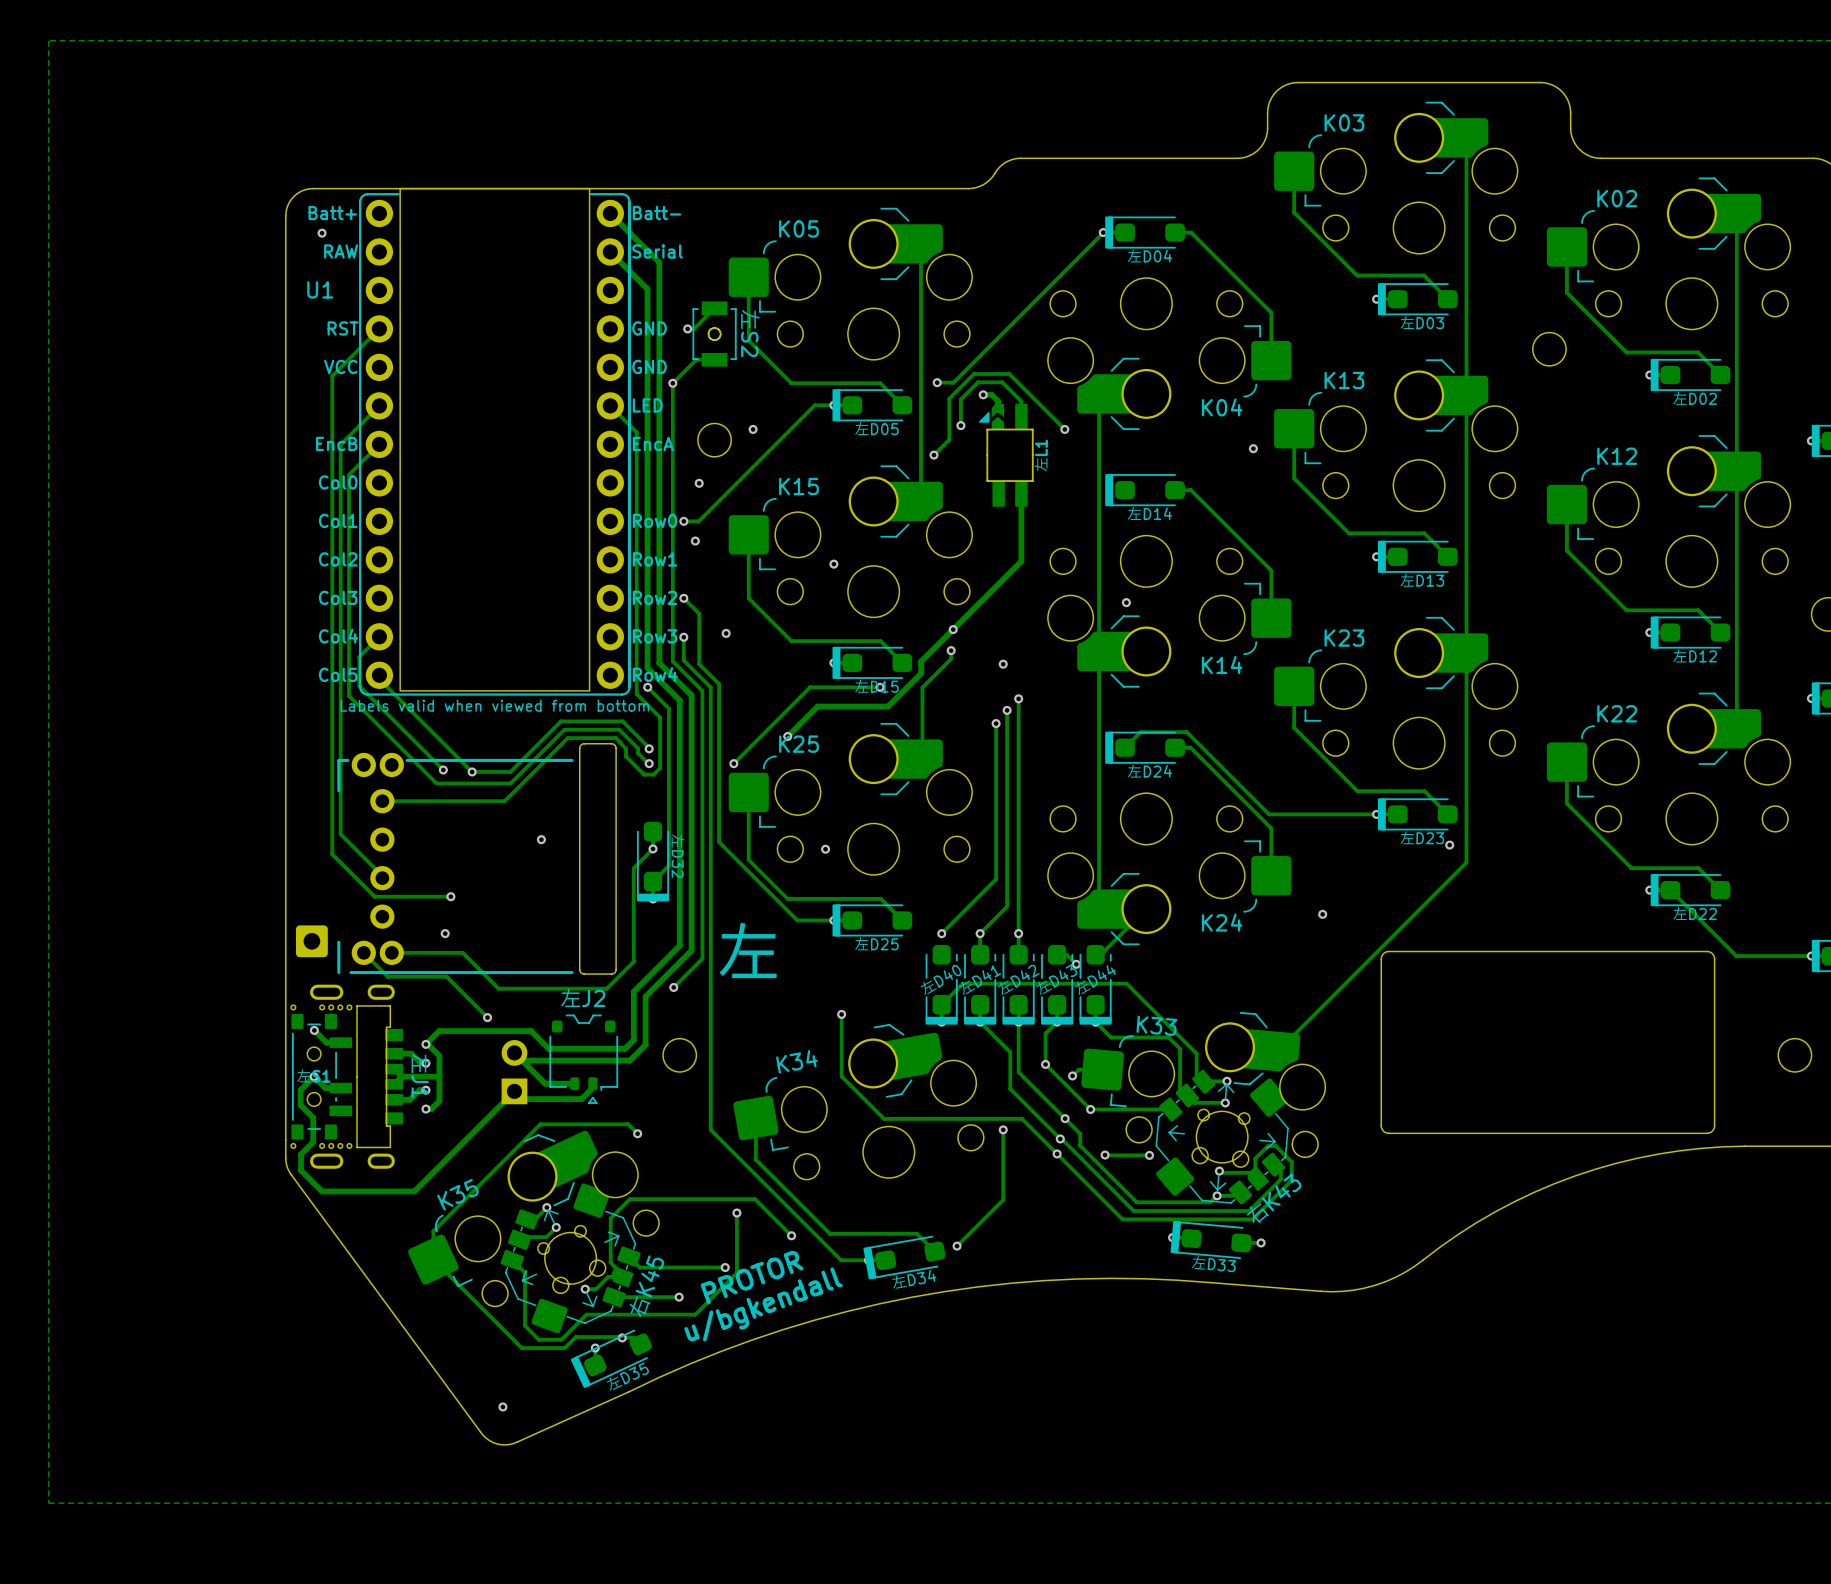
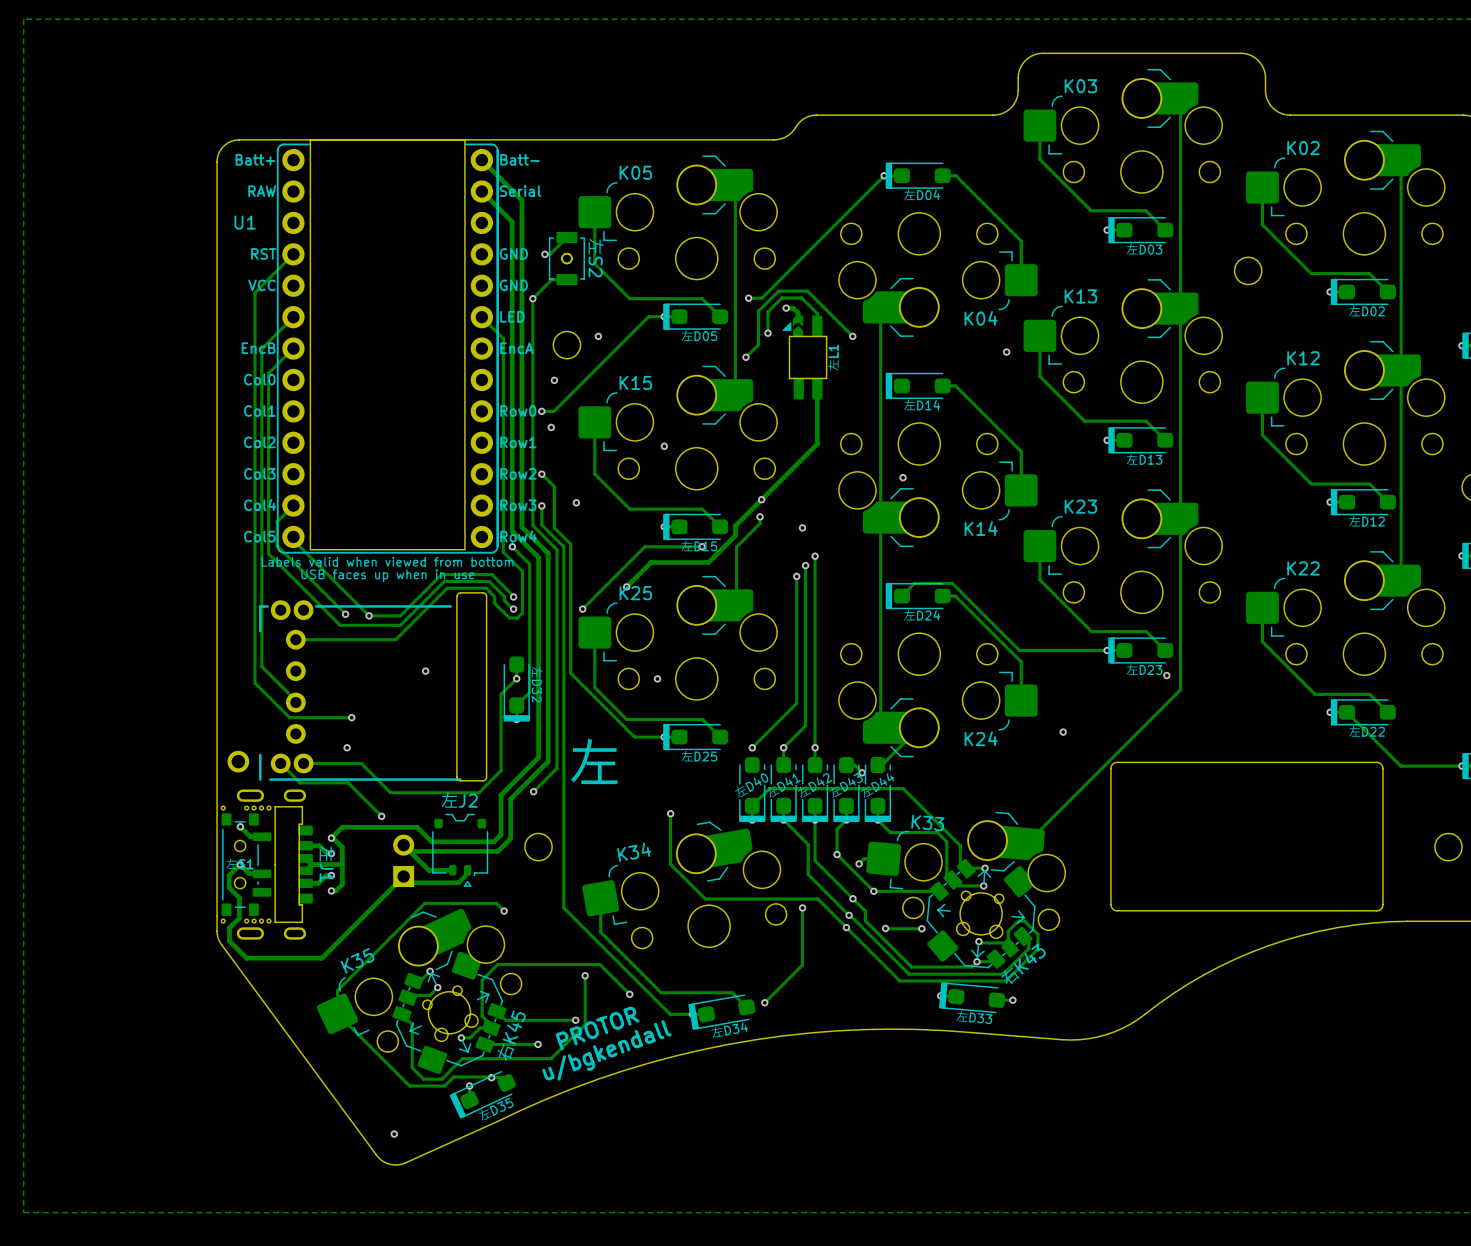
via: (322, 233) -> none
U1 text: none -> USB faces up when in use (387, 575)
part footprint: [337, 743, 617, 975] -> [259, 592, 487, 782]
part footprint: [296, 925, 328, 958] -> [227, 750, 250, 773]

